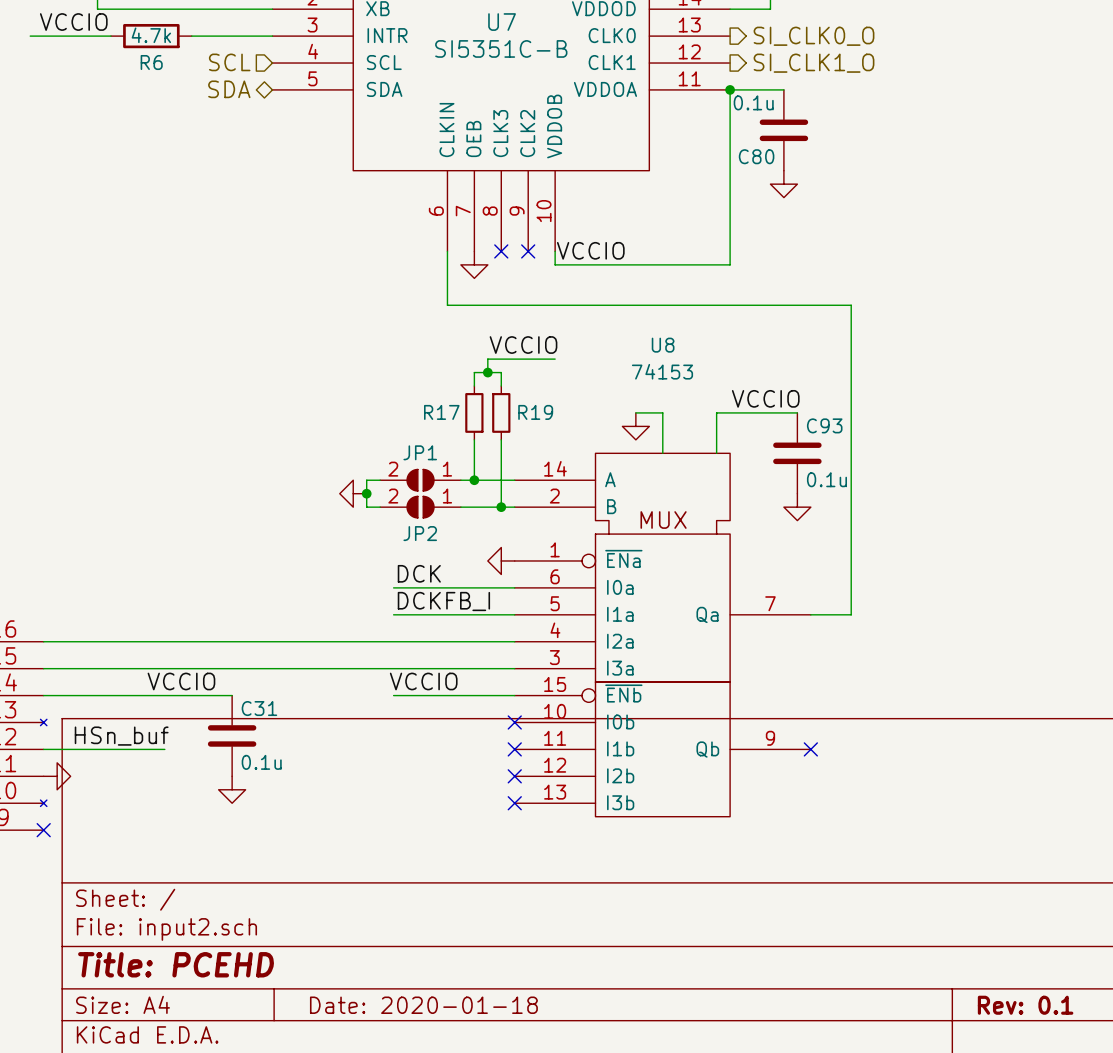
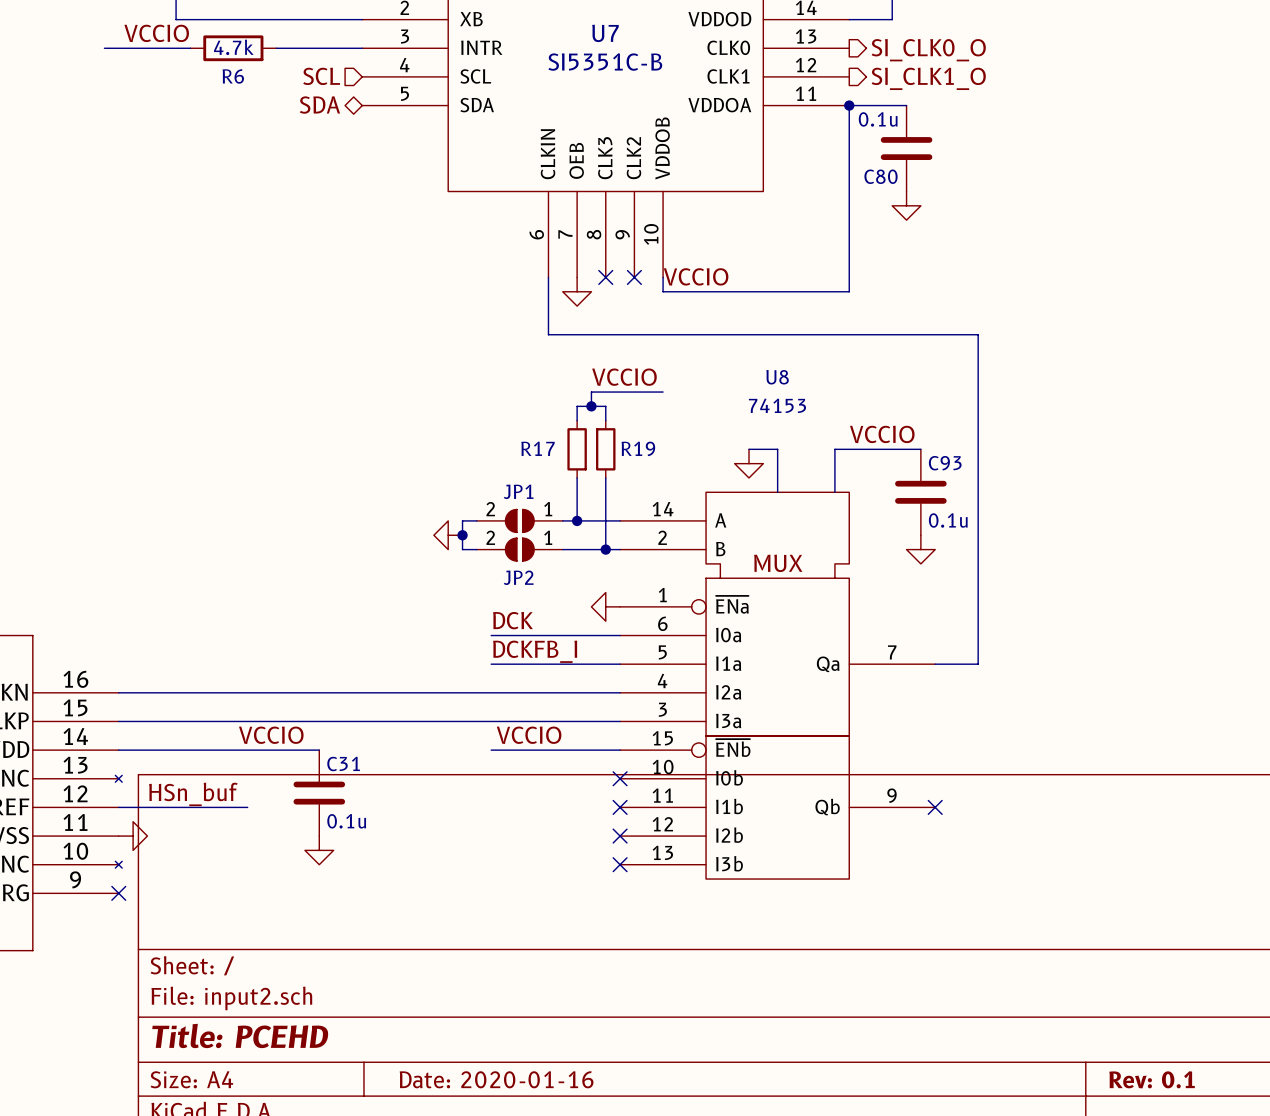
title block: Date: 2020-01-18 (423, 1005) -> Date: 2020-01-16 (496, 1079)

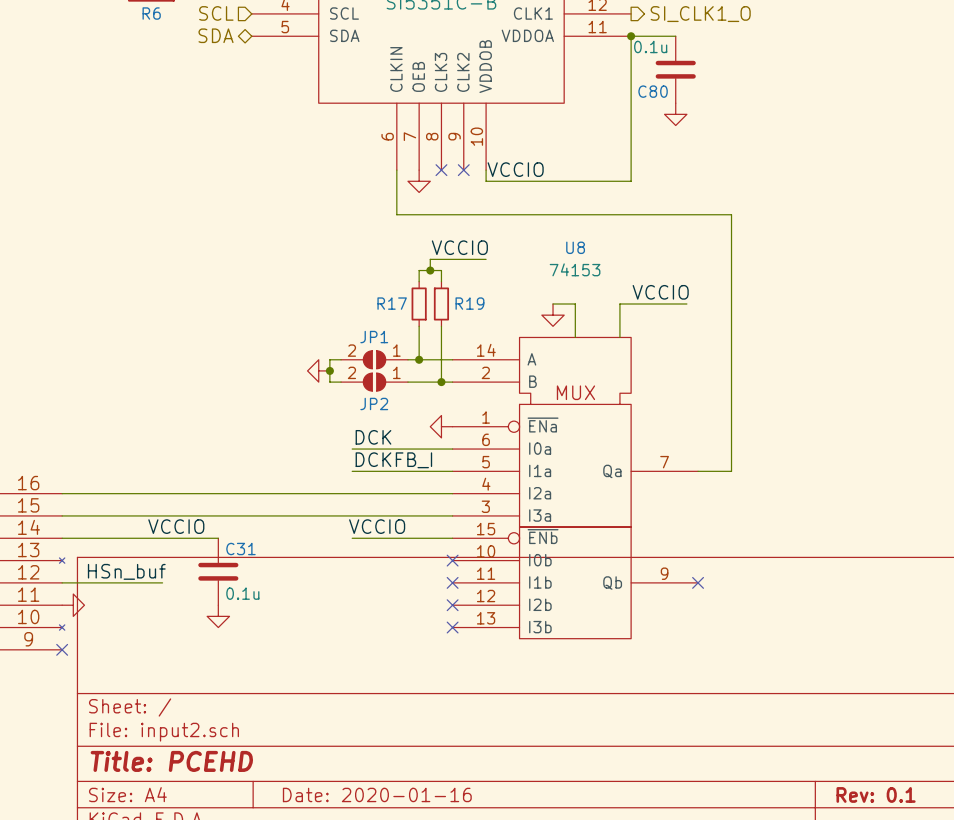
C93: 0.1u (920, 492) -> none
power symbol: (920, 549) -> none

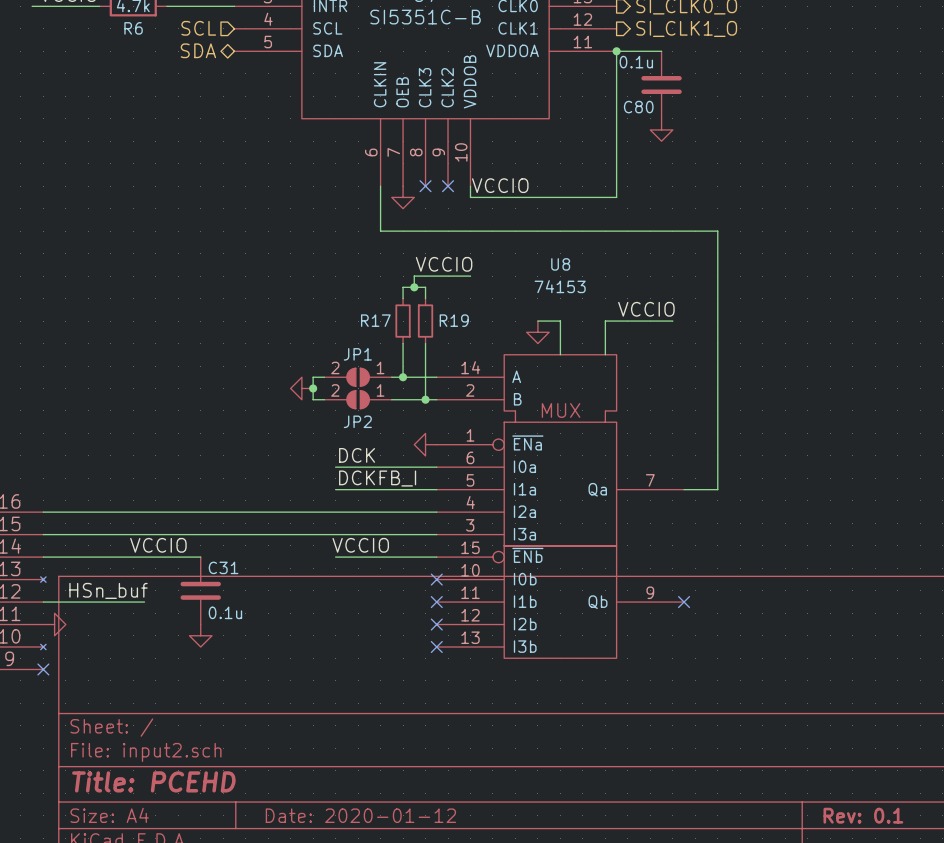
title block: Date: 2020-01-16 (377, 794) -> Date: 2020-01-12 (360, 815)

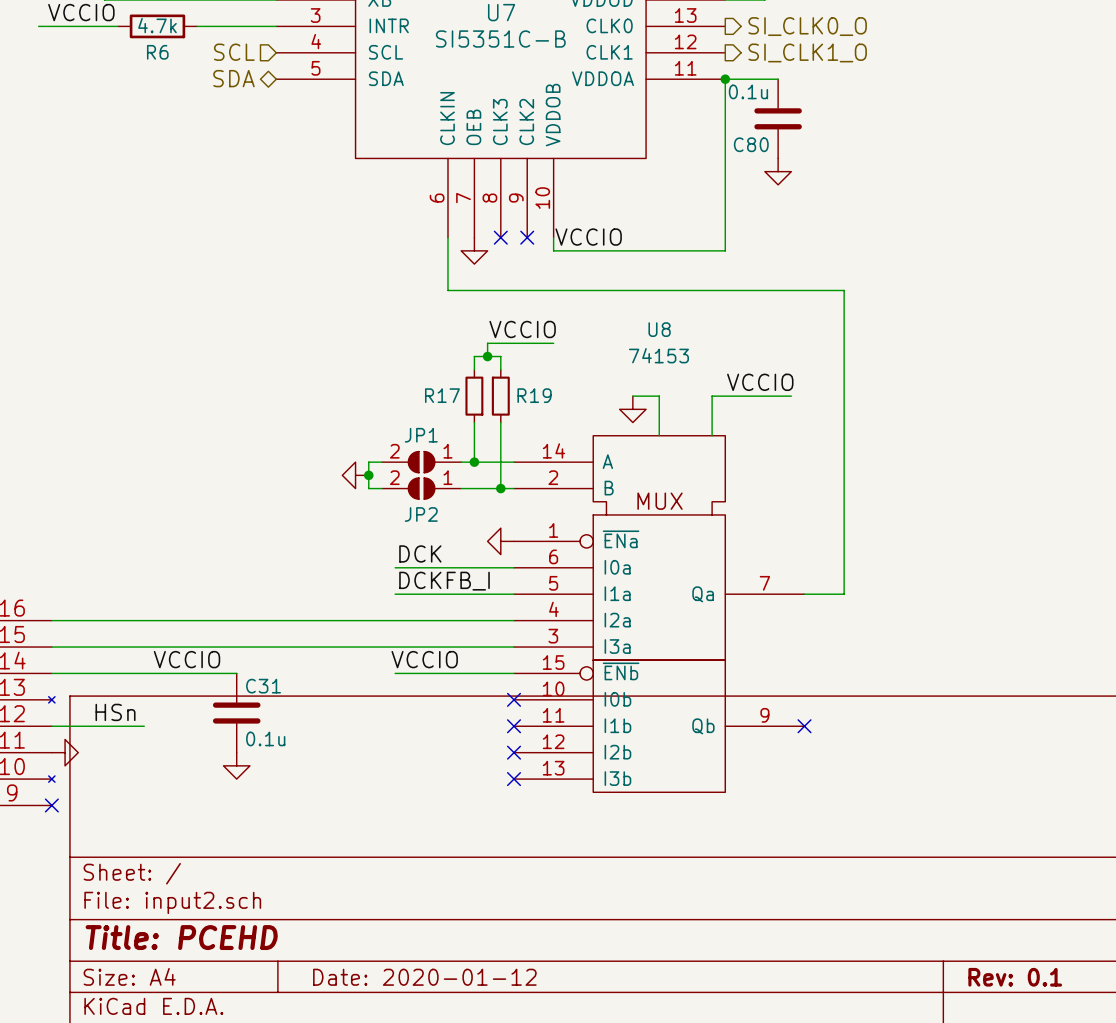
label: none -> HSn (115, 712)
label: HSn_buf (108, 590) -> none
wire: (122, 602) (144, 602) -> none

